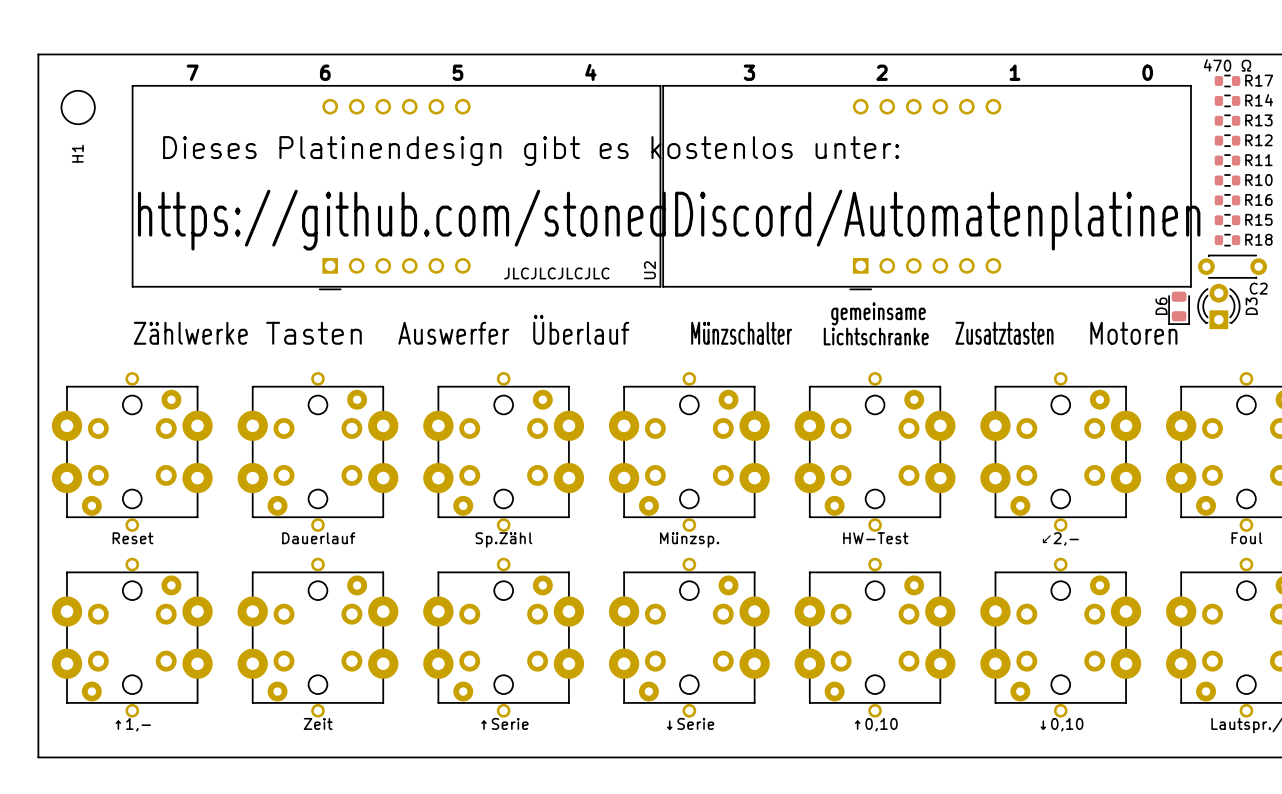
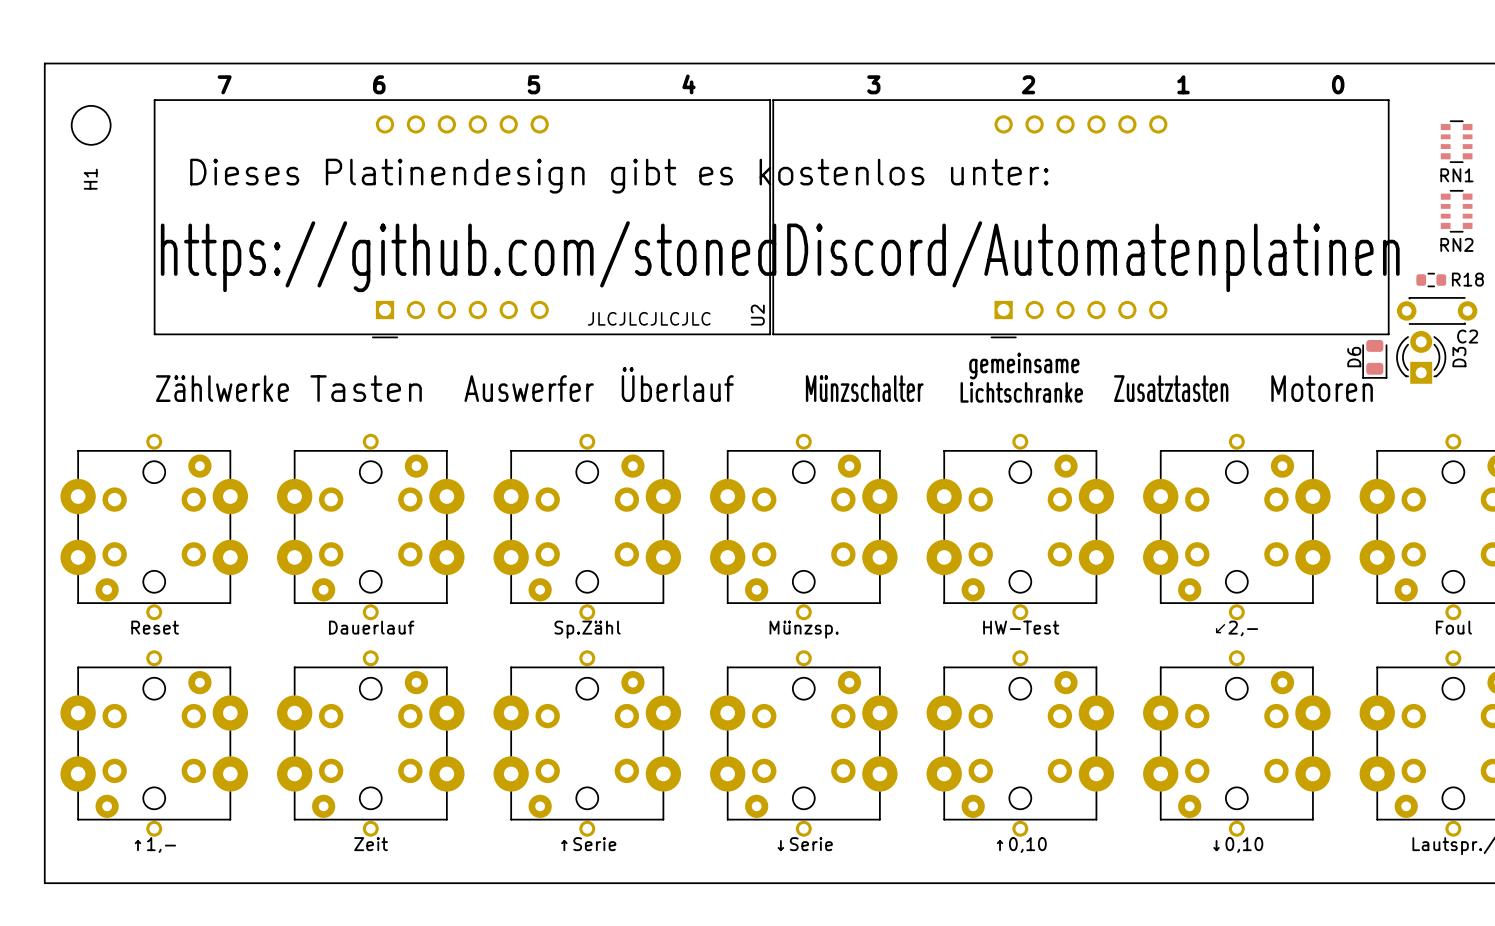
R17: 470 Ω (1227, 80) -> none
R14: (1227, 100) -> none
R13: (1227, 120) -> none
RN1: none -> (1456, 141)
R12: (1227, 140) -> none
R11: (1227, 160) -> none
R10: (1227, 180) -> none
RN2: none -> (1456, 211)
R16: (1227, 200) -> none
R15: (1227, 220) -> none

